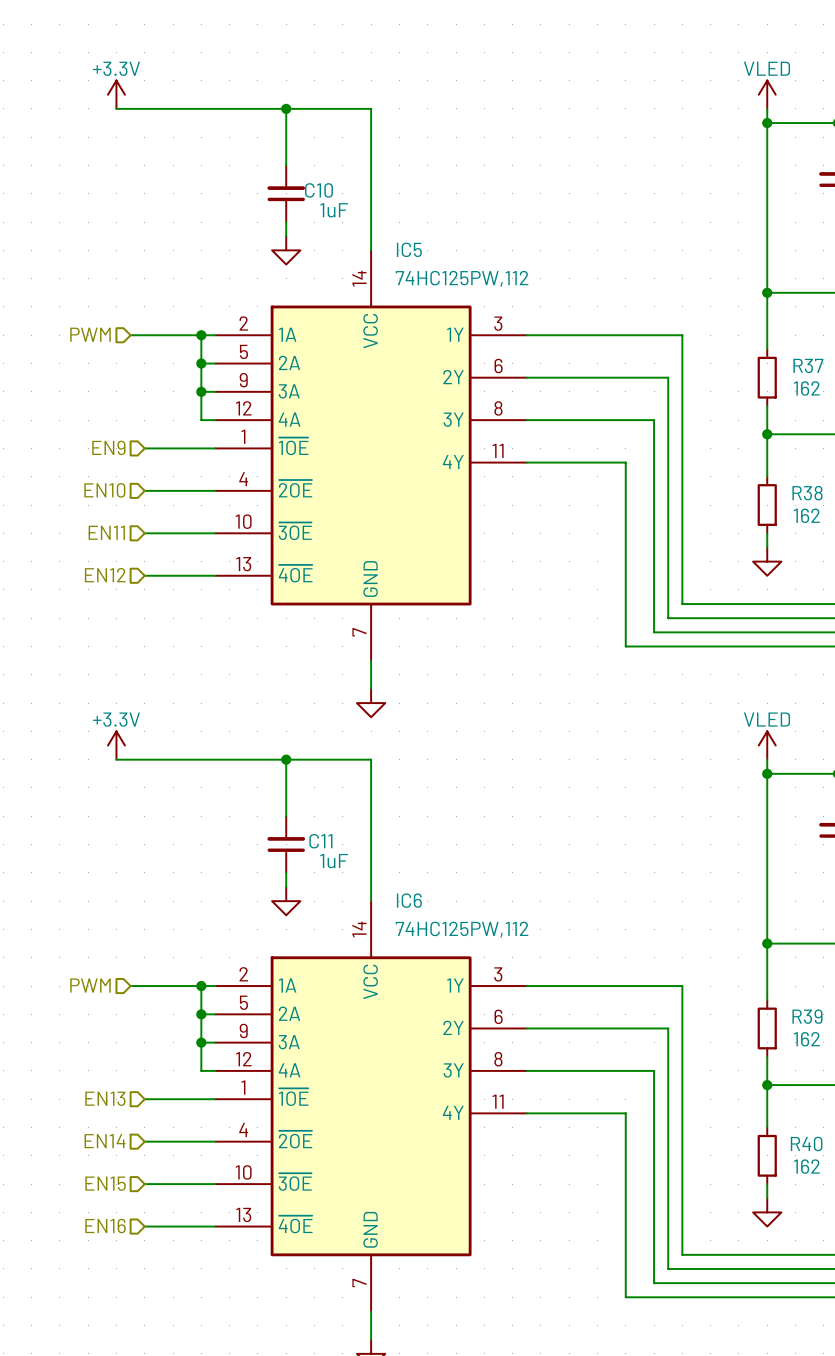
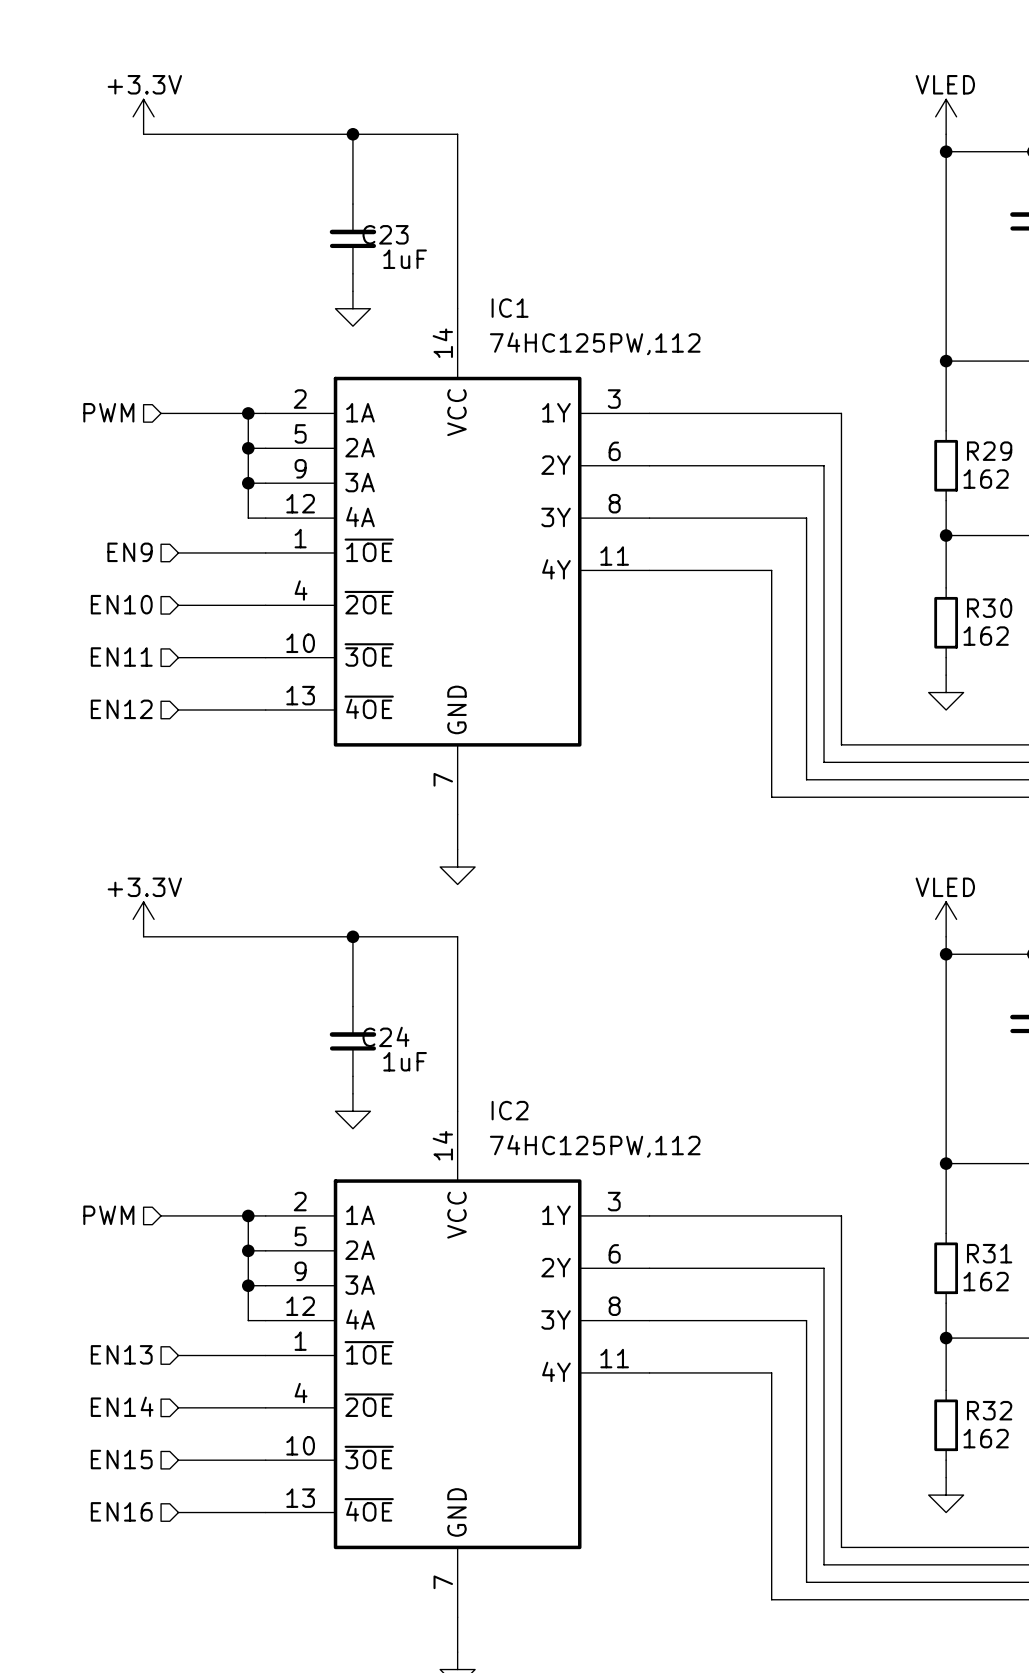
C10 name: C10 (318, 190) -> C23 (385, 234)
IC5 name: IC5 (409, 249) -> IC1 (510, 308)
R37 name: R37 (808, 365) -> R29 (989, 451)
R38 name: R38 (807, 493) -> R30 (989, 608)
C11 name: C11 (320, 841) -> C24 (385, 1036)
IC6 name: IC6 (409, 900) -> IC2 (510, 1110)
R39 name: R39 (807, 1016) -> R31 (989, 1253)
R40 name: R40 (806, 1143) -> R32 (989, 1410)

